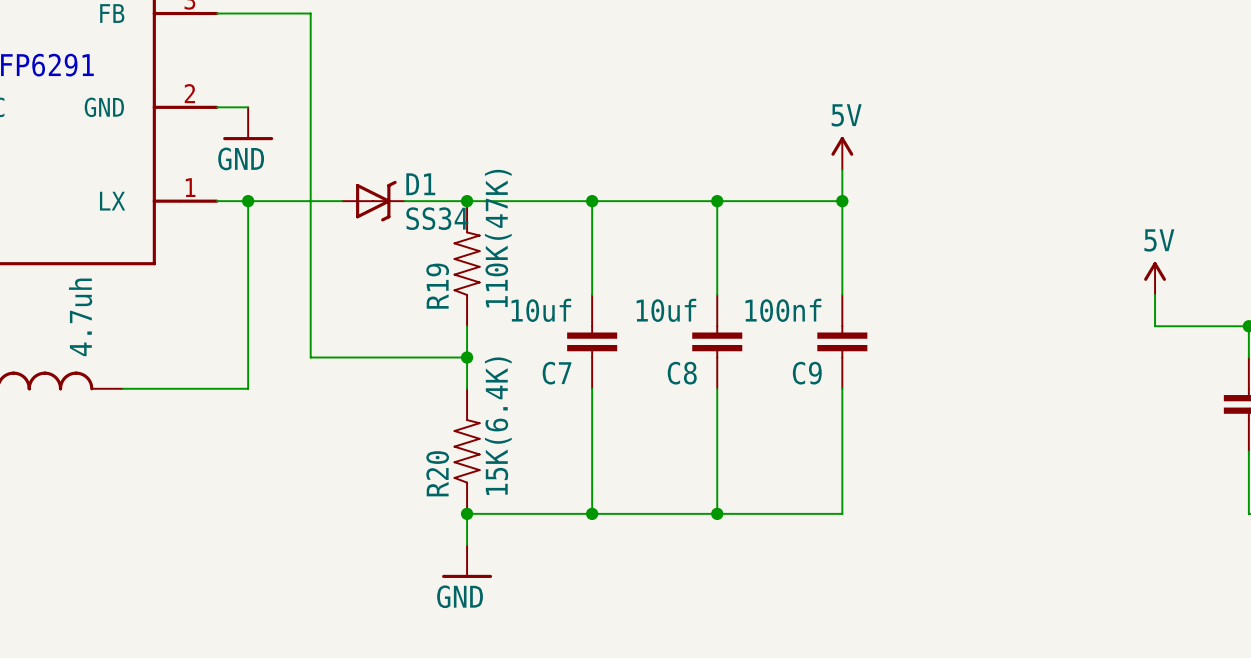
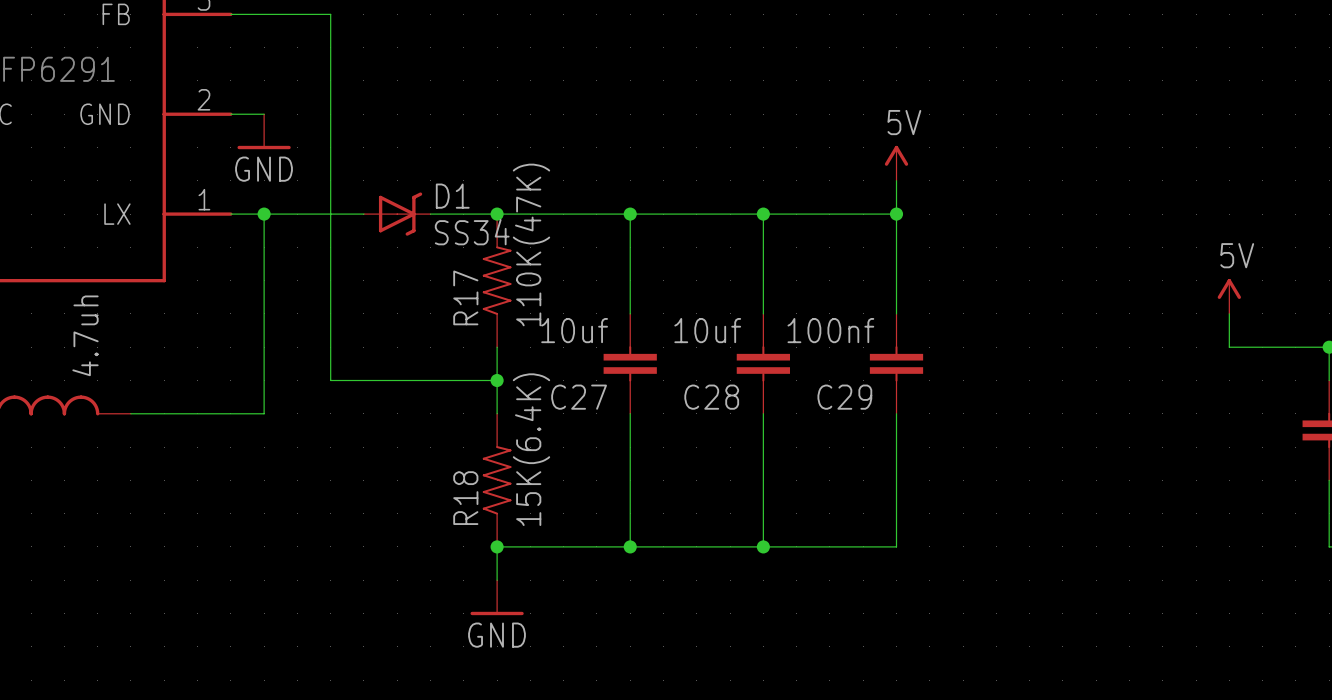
R19 name: R19 (437, 286) -> R17 (465, 297)
C7 name: C7 (557, 373) -> C27 (579, 397)
C8 name: C8 (682, 373) -> C28 (711, 397)
C9 name: C9 (807, 373) -> C29 (844, 397)
R20 name: R20 (437, 473) -> R18 (465, 498)

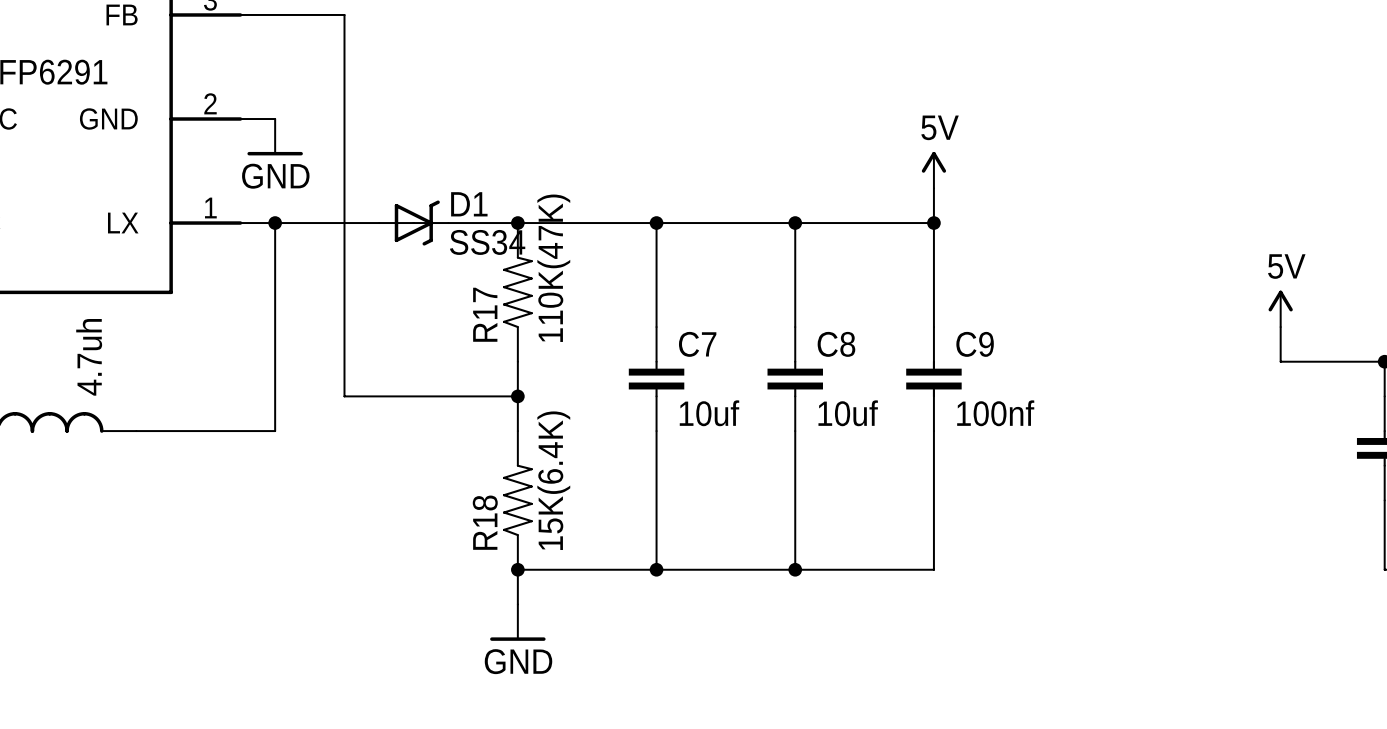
C27 value position: 10uf (574, 330) -> 10uf (709, 413)
C28 value position: 10uf (707, 330) -> 10uf (848, 413)
C29 value position: 100nf (830, 330) -> 100nf (995, 413)
C27 name: C27 (579, 397) -> C7 (697, 344)
C28 name: C28 (711, 397) -> C8 (836, 344)
C29 name: C29 (844, 397) -> C9 (975, 344)

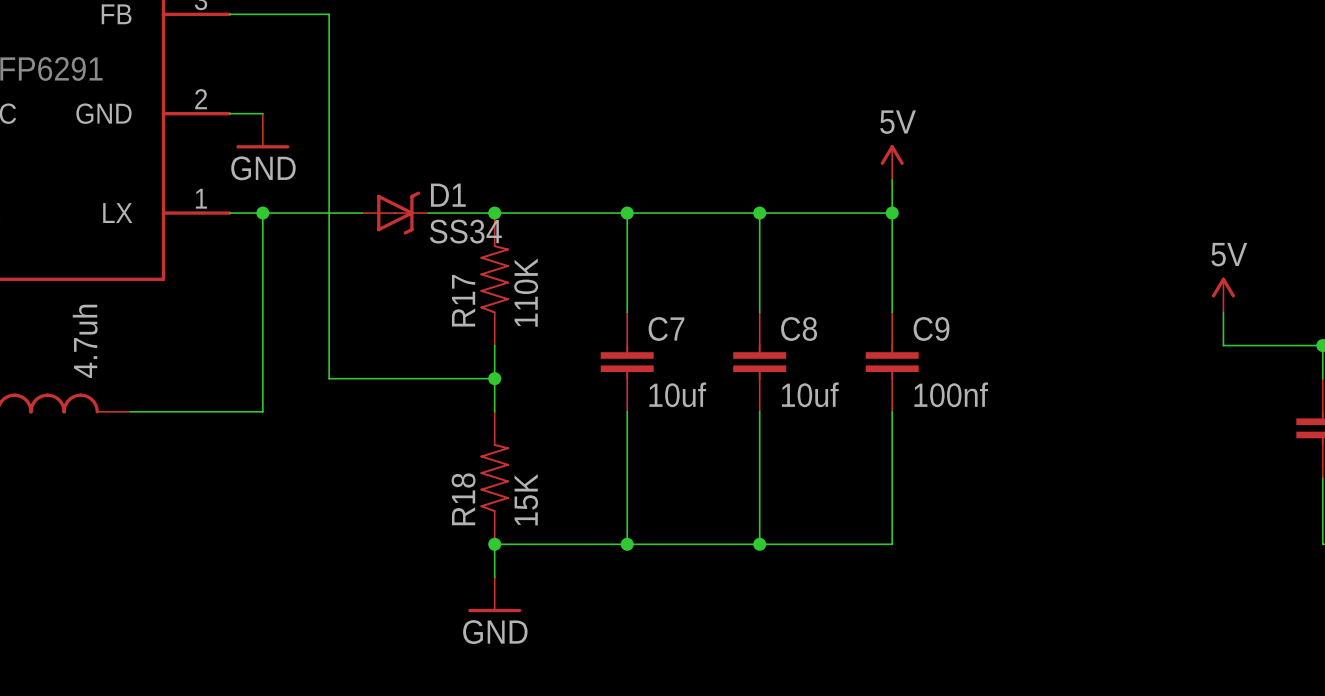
R17 value: 110K(47K) (553, 268) -> 110K (526, 292)
R18 value: 15K(6.4K) (553, 480) -> 15K (526, 499)

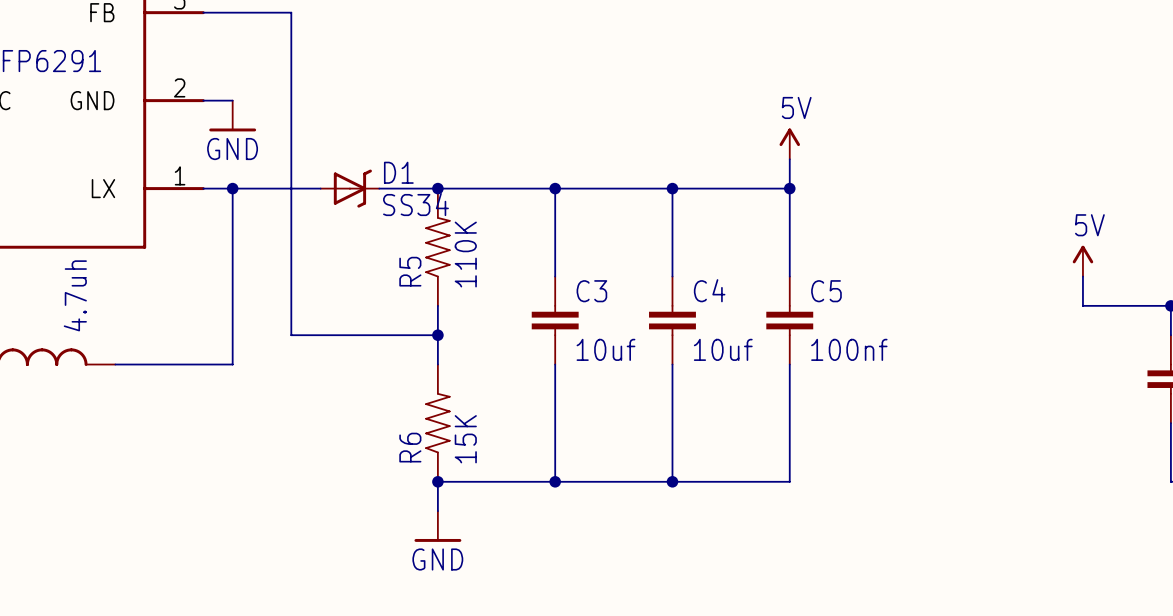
R17 name: R17 (463, 300) -> R5 (410, 271)
C7 name: C7 (666, 328) -> C3 (591, 291)
C8 name: C8 (799, 328) -> C4 (709, 290)
C9 name: C9 (931, 328) -> C5 (826, 291)
R18 name: R18 (463, 499) -> R6 (410, 447)

